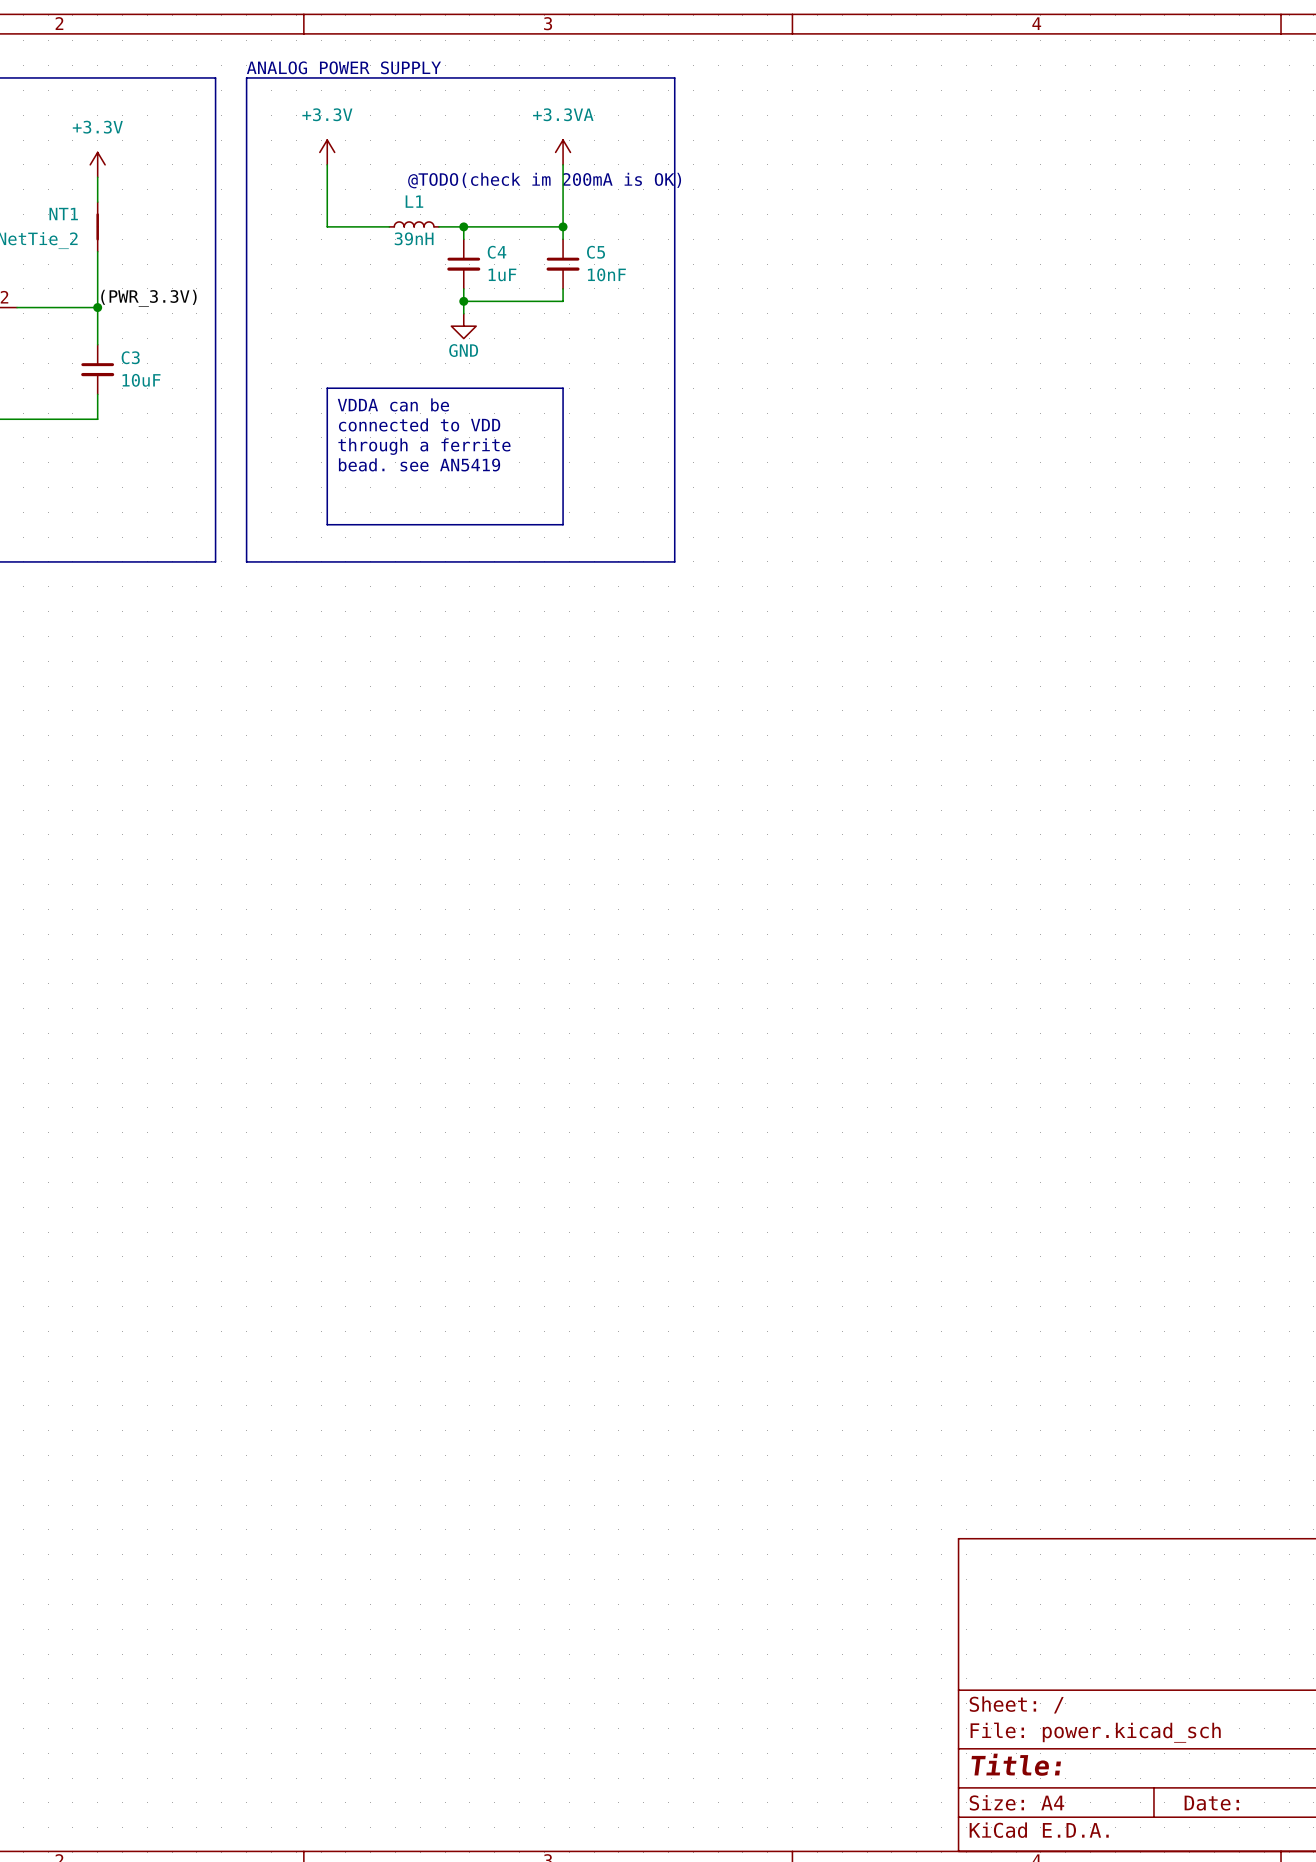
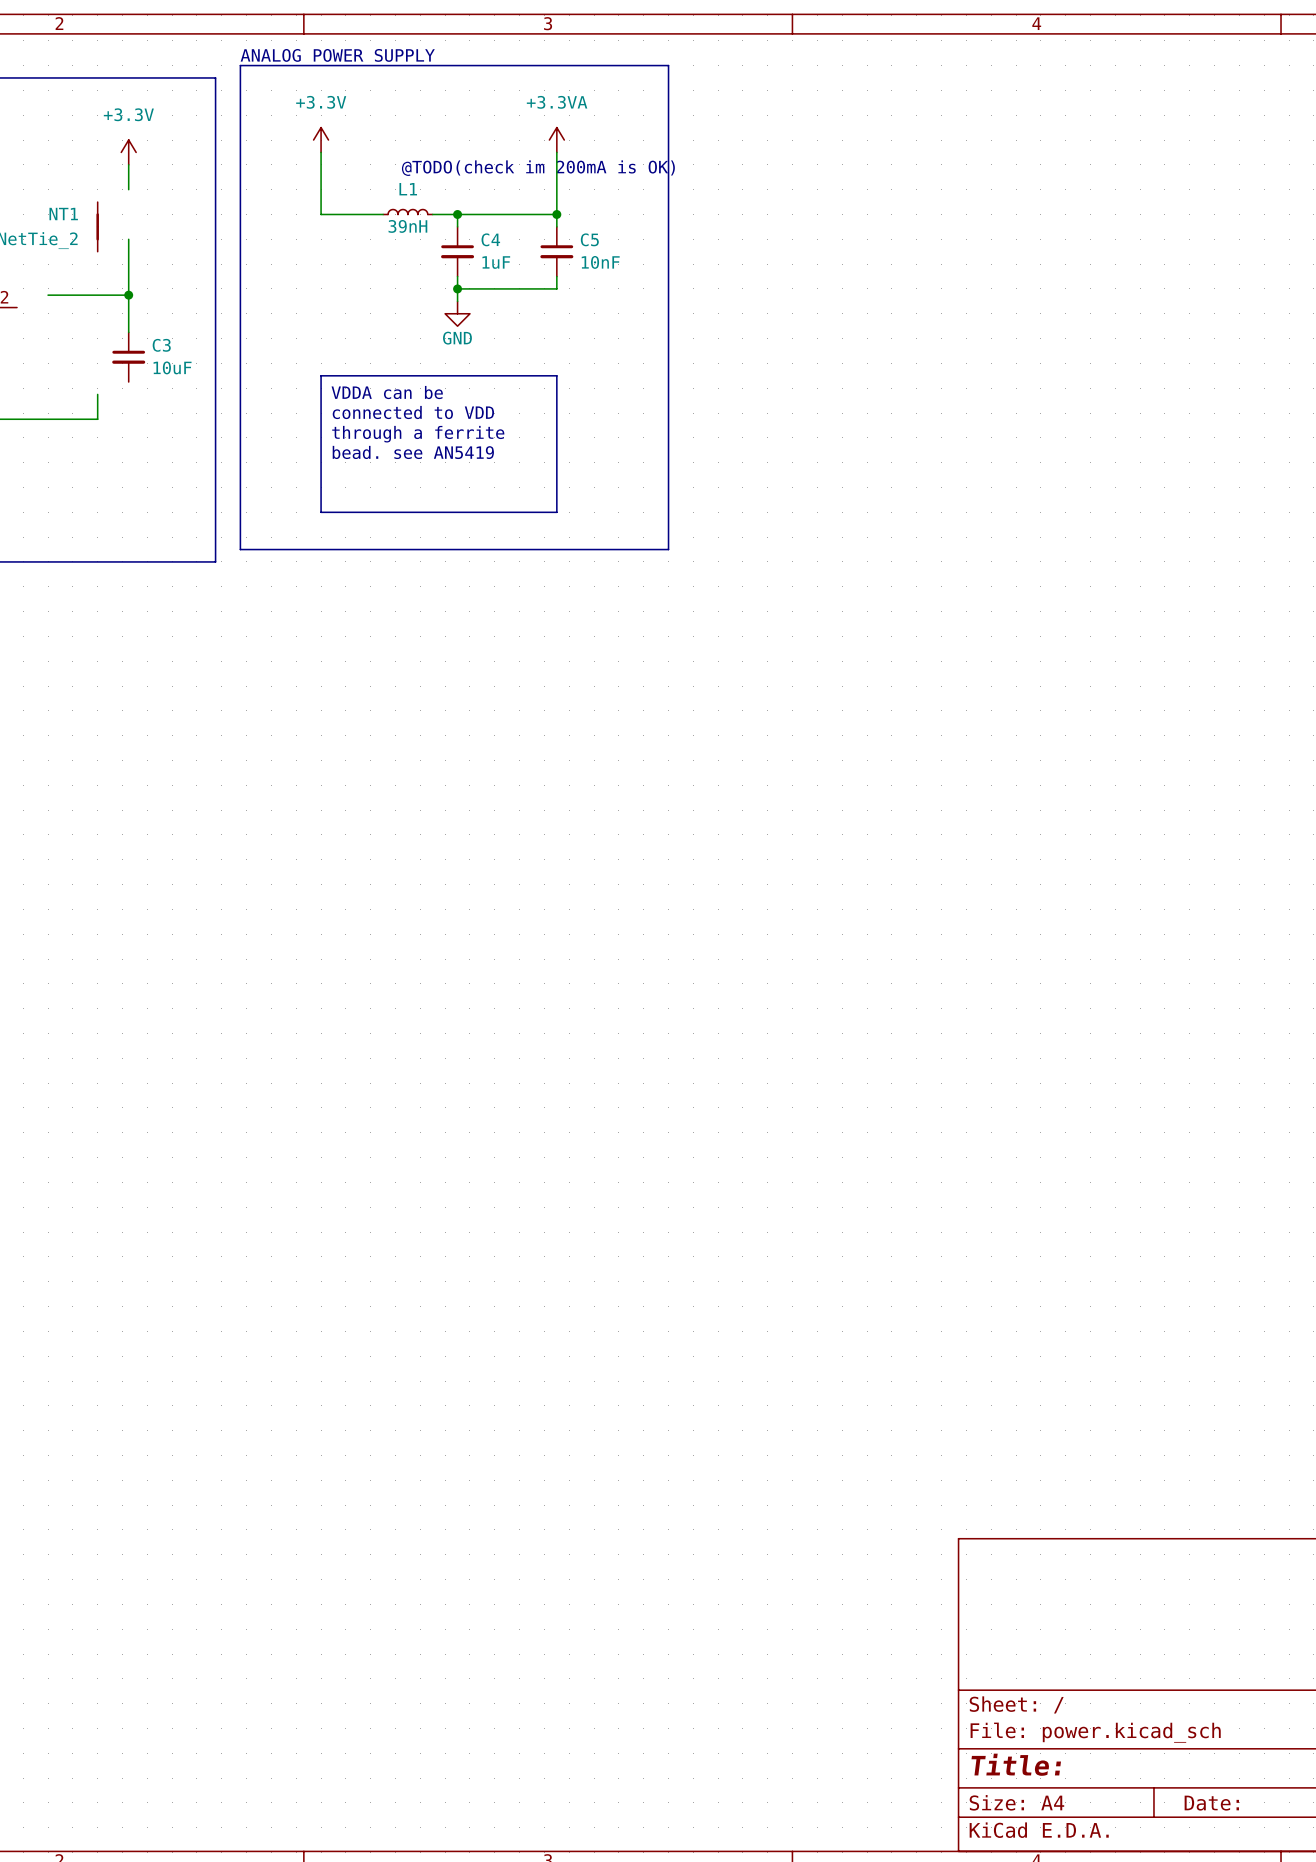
text position: ANALOG POWER SUPPLY (343, 67) -> ANALOG POWER SUPPLY (337, 55)
line: (246, 77) (674, 77) (674, 561) (246, 561) (246, 77) -> (240, 65) (668, 65) (668, 549) (240, 549) (240, 65)
power symbol position: +3.3V (327, 152) -> +3.3V (321, 140)
power symbol position: +3.3VA (563, 152) -> +3.3VA (556, 140)
power symbol position: +3.3V (97, 164) -> +3.3V (128, 152)
wire: (327, 164) (327, 226) (389, 226) -> (321, 152) (321, 214) (383, 214)
wire: (563, 164) (563, 239) -> (556, 152) (556, 226)
wire: (97, 177) (97, 202) -> (128, 164) (128, 189)
text position: @TODO(check im 200mA is OK) (544, 180) -> @TODO(check im 200mA is OK) (538, 168)
L1 position: (414, 224) -> (407, 212)
wire: (438, 226) (563, 226) -> (432, 214) (556, 214)
wire: (463, 226) (463, 239) -> (457, 214) (457, 226)
junction position: (463, 226) -> (457, 214)
junction position: (563, 226) -> (556, 214)
wire: (97, 251) (97, 344) -> (128, 239) (128, 332)
C4 position: (463, 264) -> (457, 251)
C5 position: (563, 264) -> (556, 251)
wire: (463, 288) (463, 313) -> (457, 276) (457, 301)
wire: (563, 288) (563, 301) (463, 301) -> (556, 276) (556, 288) (457, 288)
label: (PWR_3.3V) (148, 298) -> none
junction position: (463, 301) -> (457, 288)
wire: (17, 307) (97, 307) -> (48, 295) (128, 295)
junction position: (97, 307) -> (128, 295)
power symbol position: GND (463, 326) -> GND (457, 313)
C3 position: (97, 369) -> (128, 357)
line: (327, 388) (563, 388) (563, 524) (327, 524) (327, 388) -> (321, 375) (556, 375) (556, 512) (321, 512) (321, 375)
text position: VDDA can be (393, 404) -> VDDA can be (387, 392)
text position: connected to VDD (419, 424) -> connected to VDD (413, 412)
text position: through a ferrite (424, 446) -> through a ferrite (418, 434)
text position: bead. see AN5419 (419, 464) -> bead. see AN5419 (413, 452)

